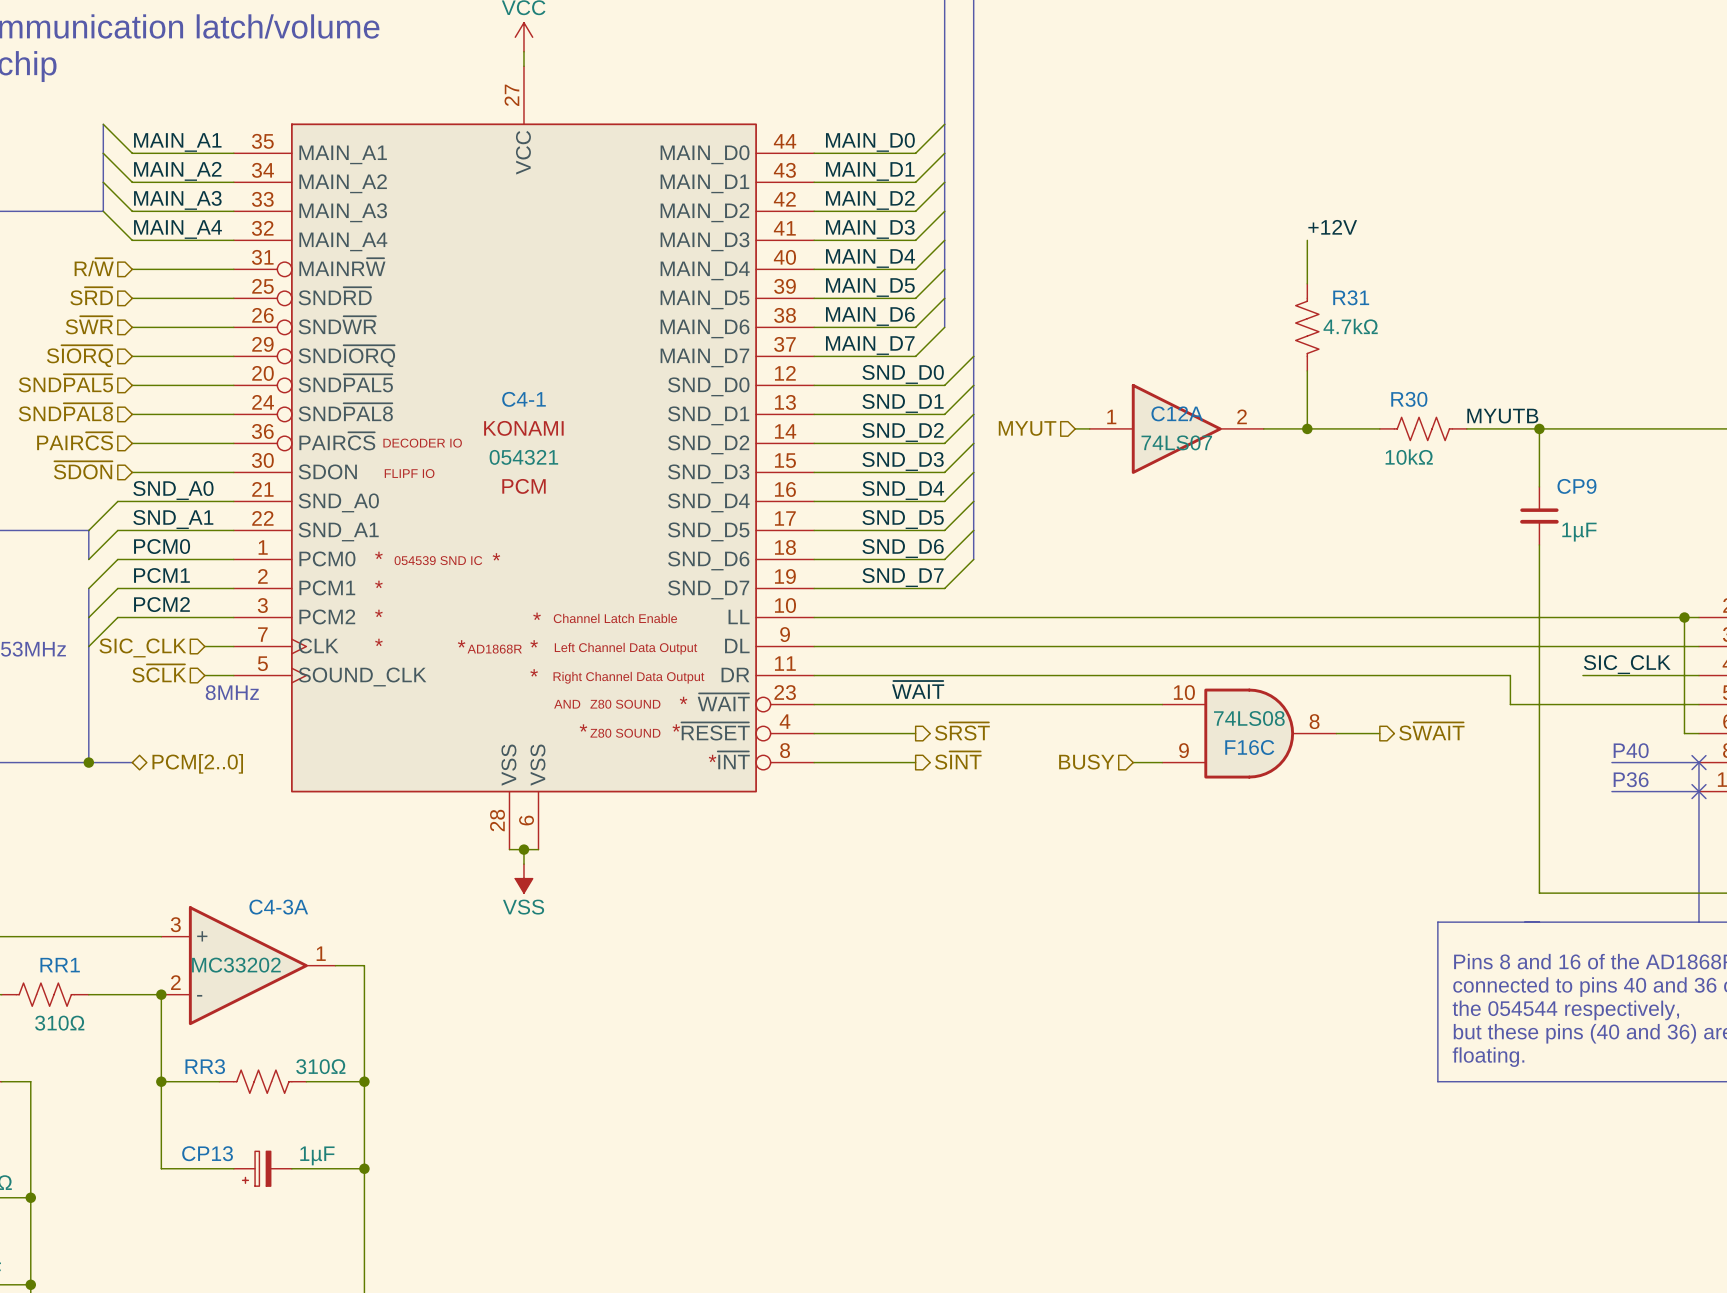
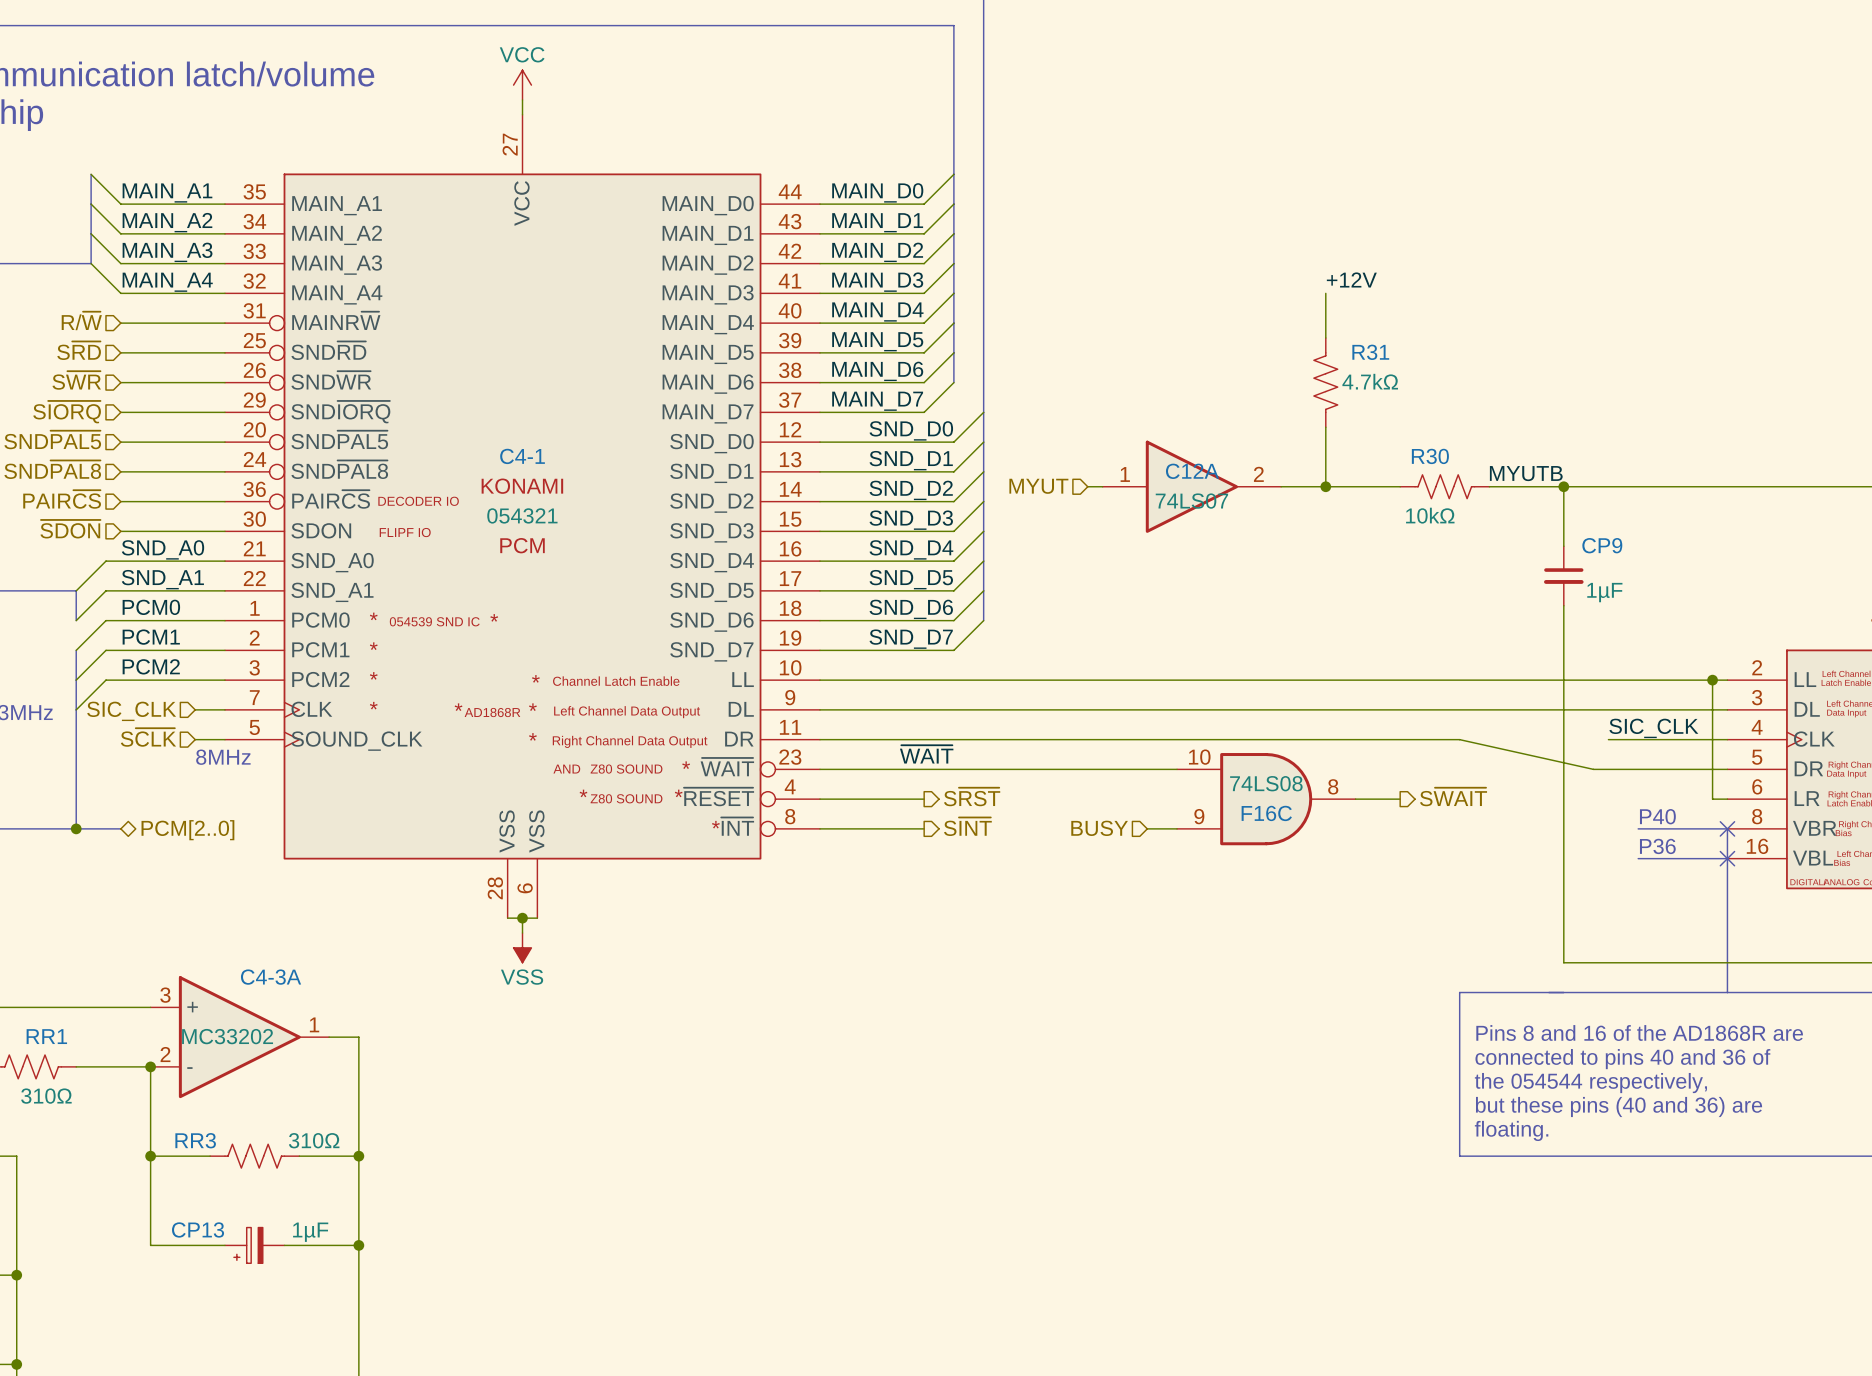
wire: (1437, 675) (1510, 675) (1510, 704) (1568, 704) -> (1459, 739) (1593, 769)

